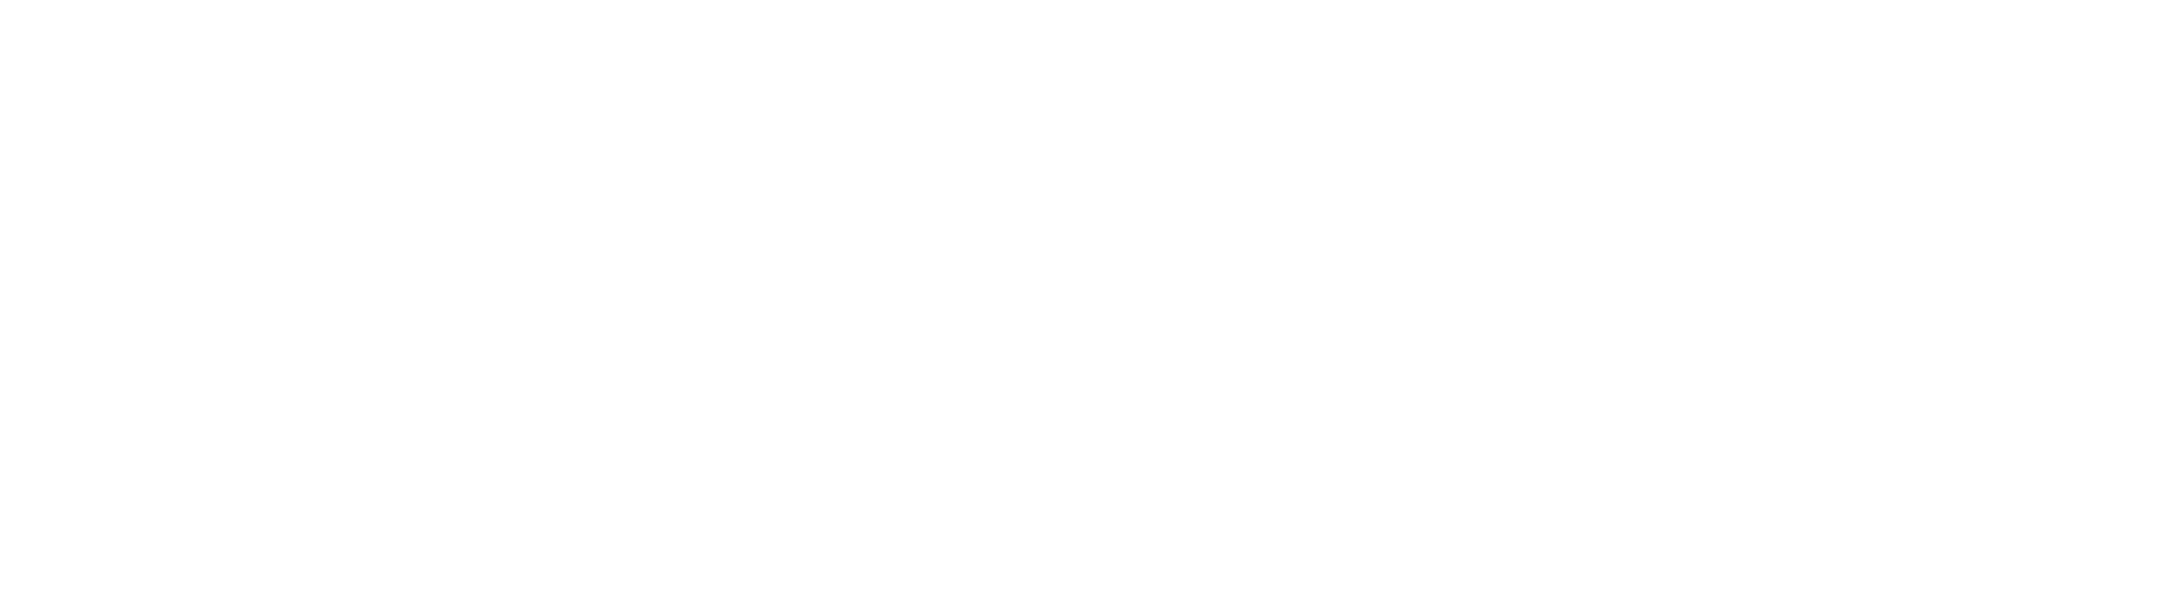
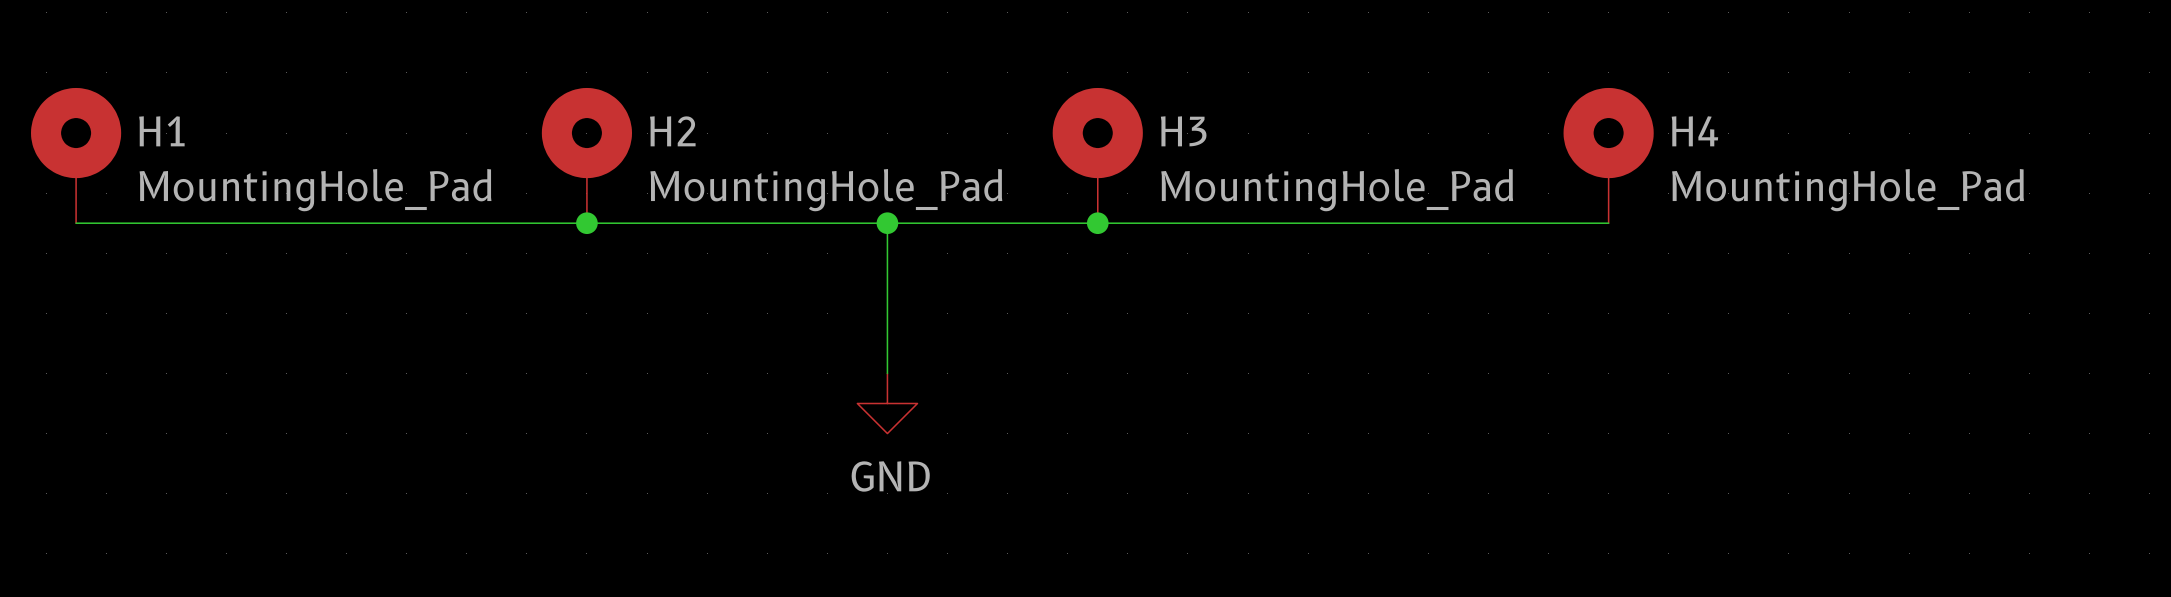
H1: none -> MountingHole_Pad (76, 155)
H2: none -> MountingHole_Pad (586, 155)
H3: none -> MountingHole_Pad (1097, 155)
H4: none -> MountingHole_Pad (1608, 155)
wire: none -> (76, 223) (1608, 223)
junction: none -> (586, 223)
wire: none -> (887, 223) (887, 373)
junction: none -> (887, 223)
junction: none -> (1097, 223)
power symbol: none -> GND (887, 403)

